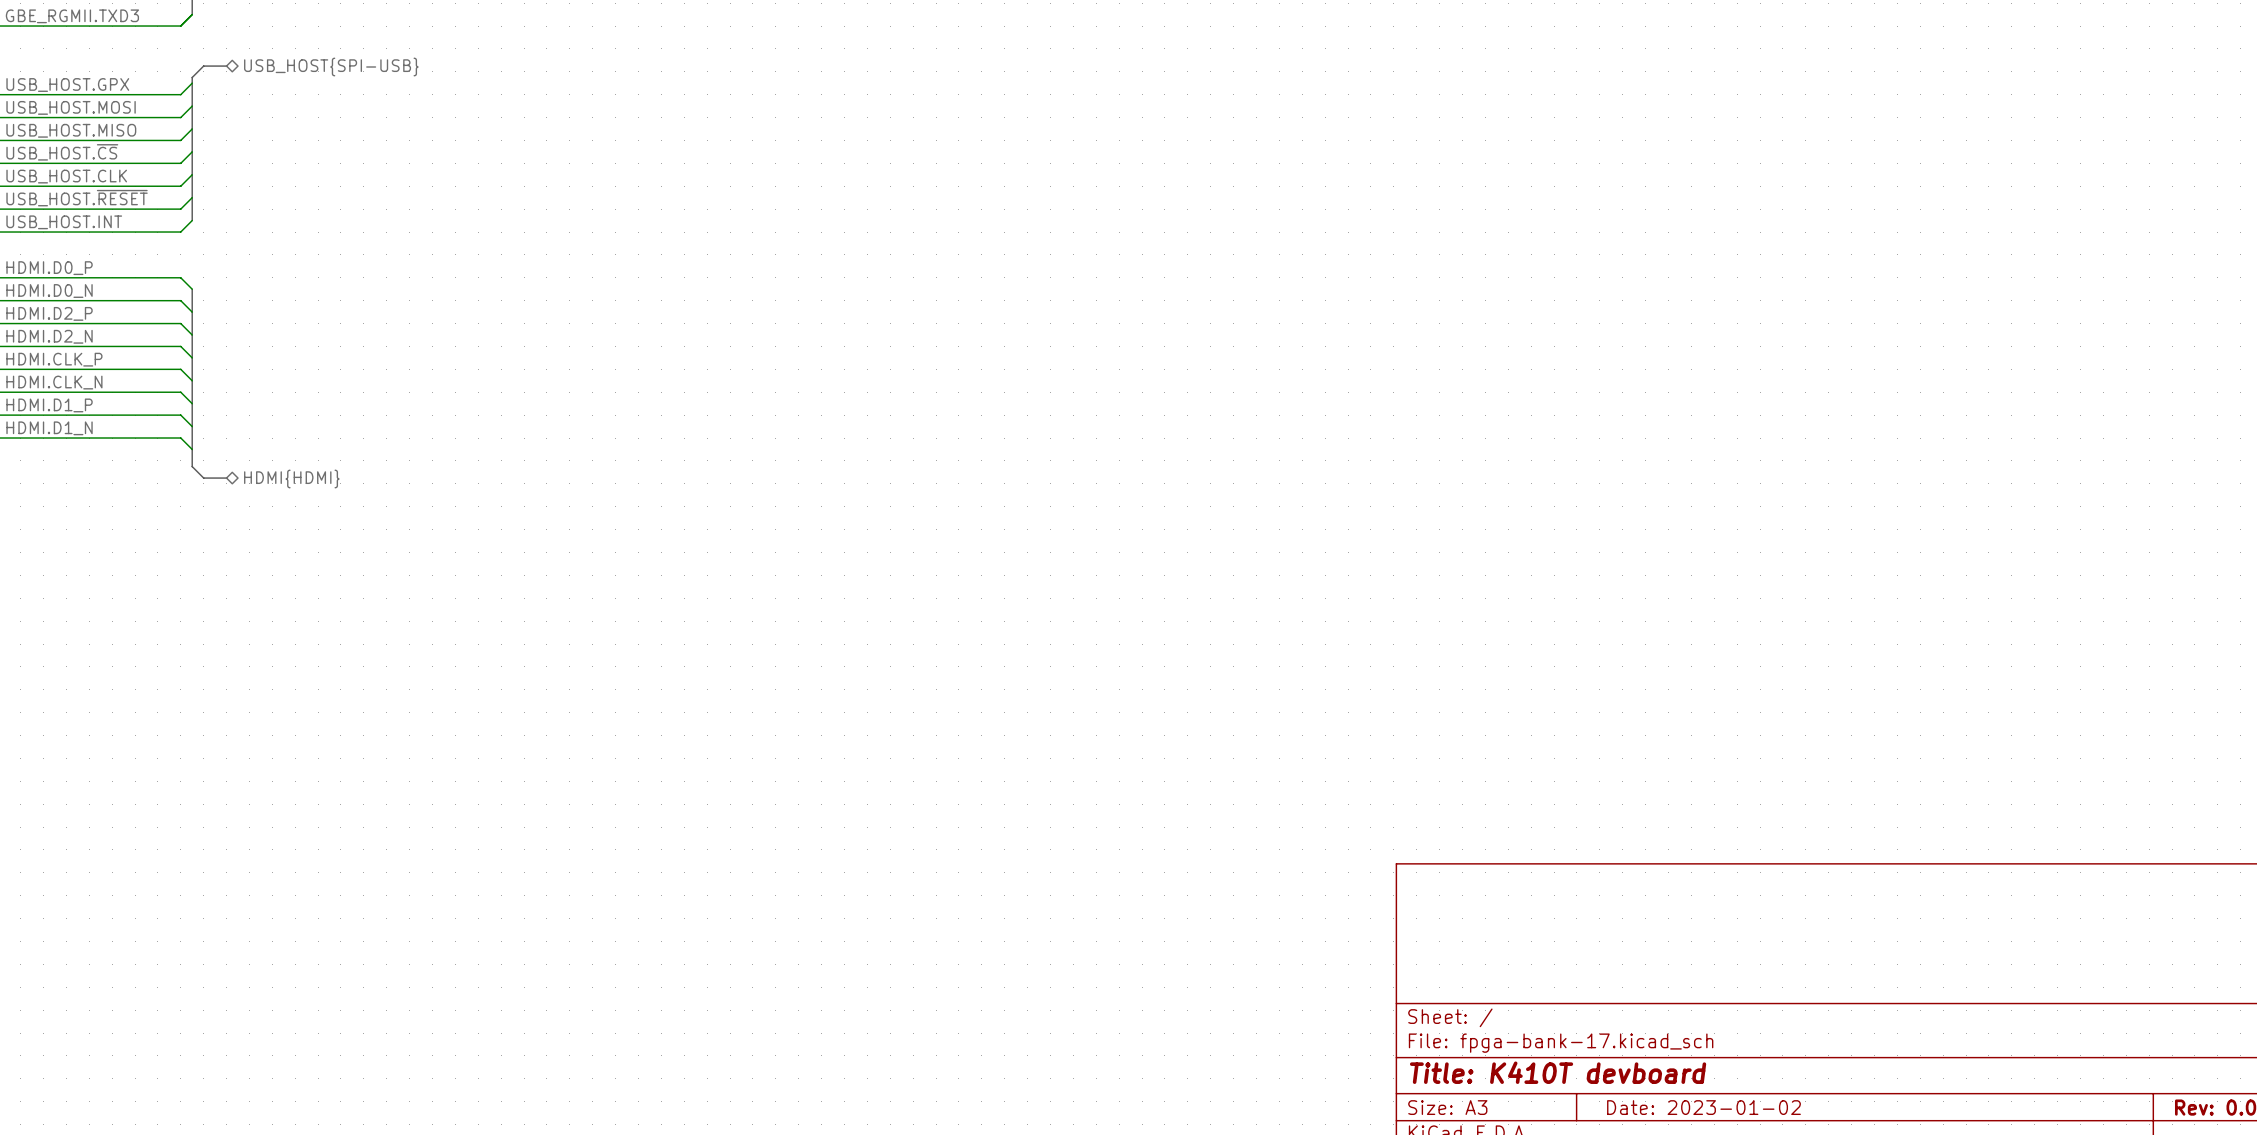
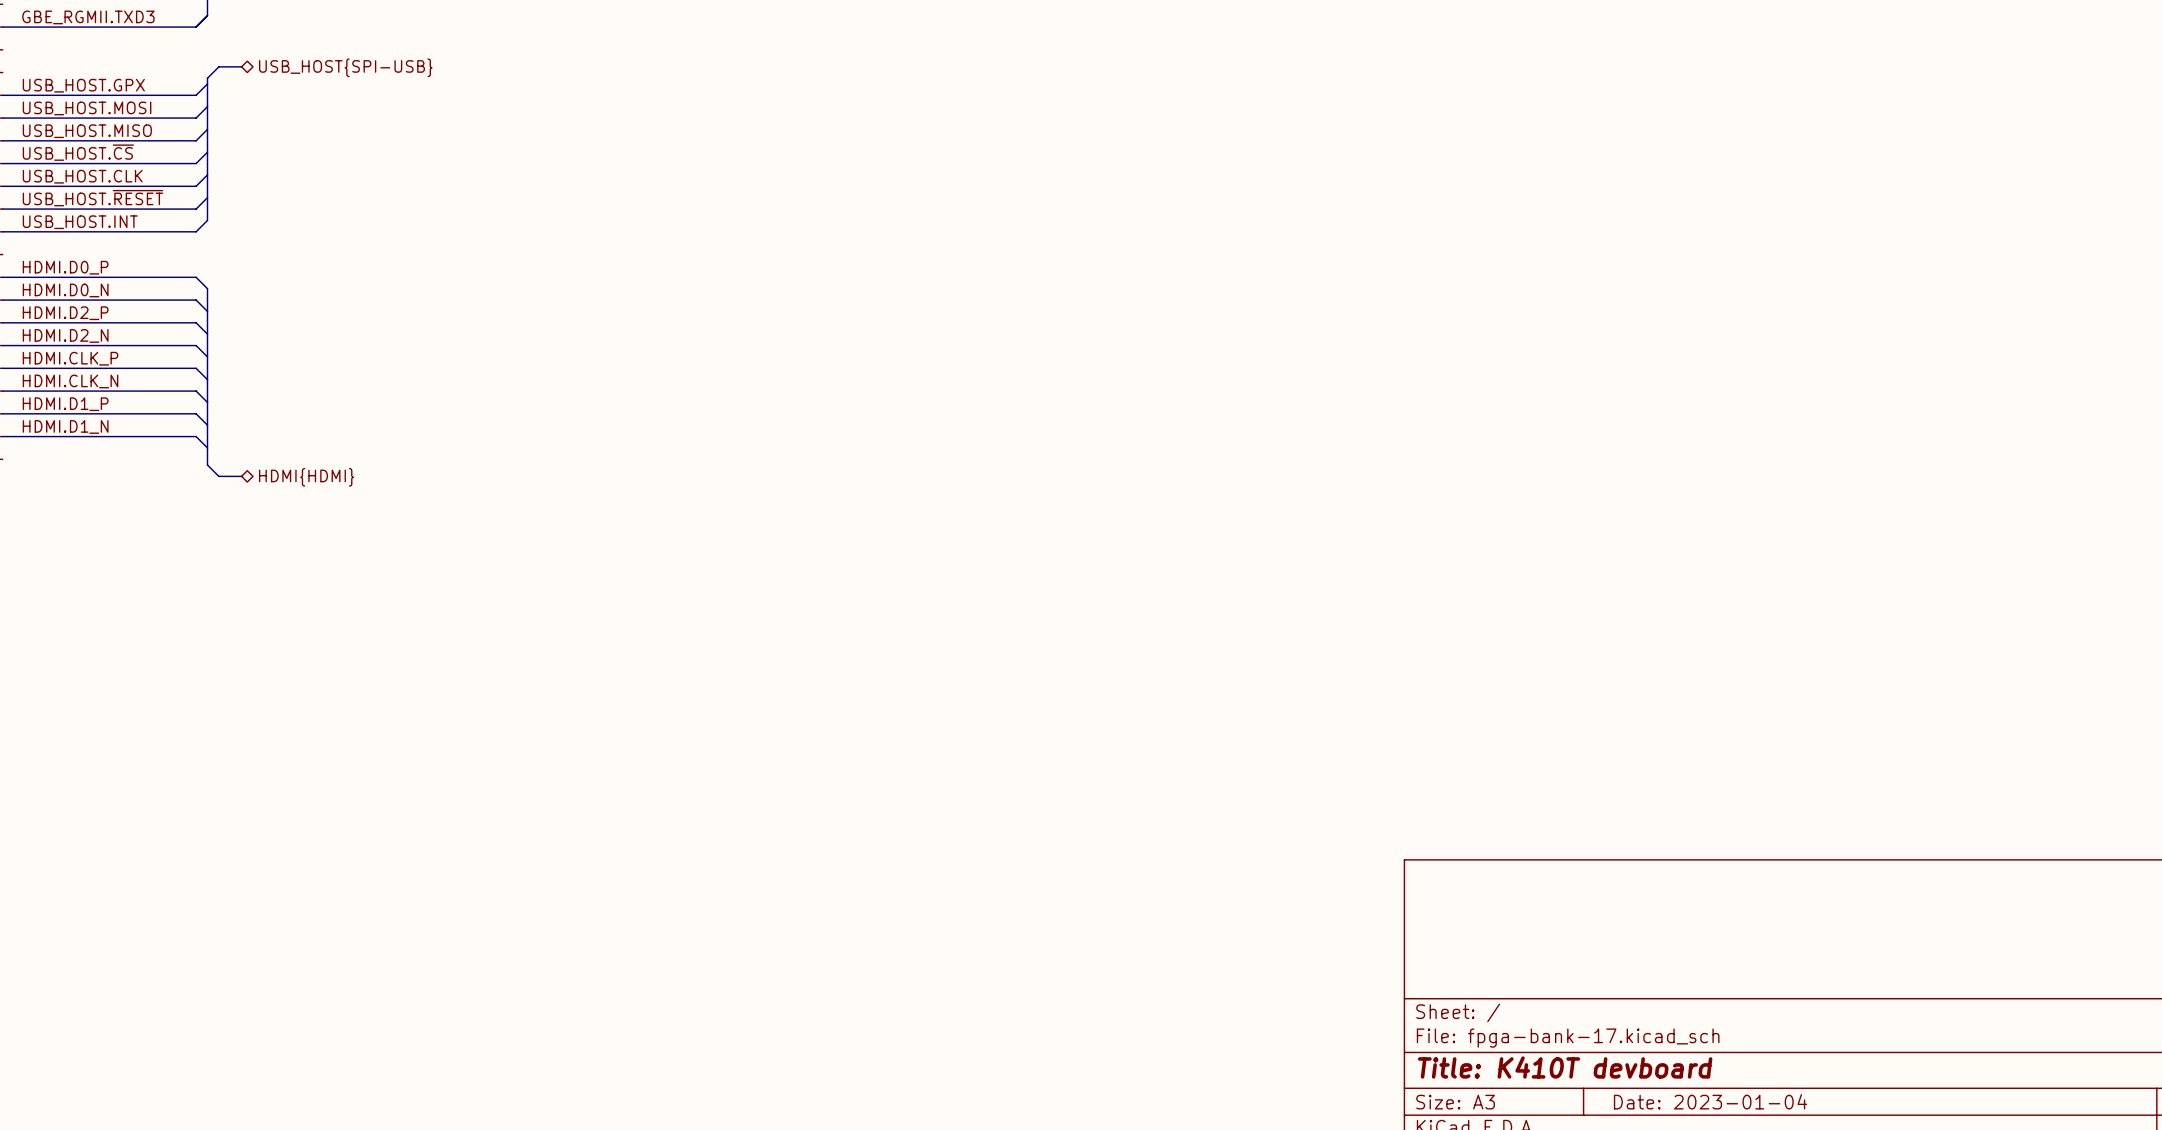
title block: Date: 2023-01-02 (1703, 1107) -> Date: 2023-01-04 (1710, 1101)

